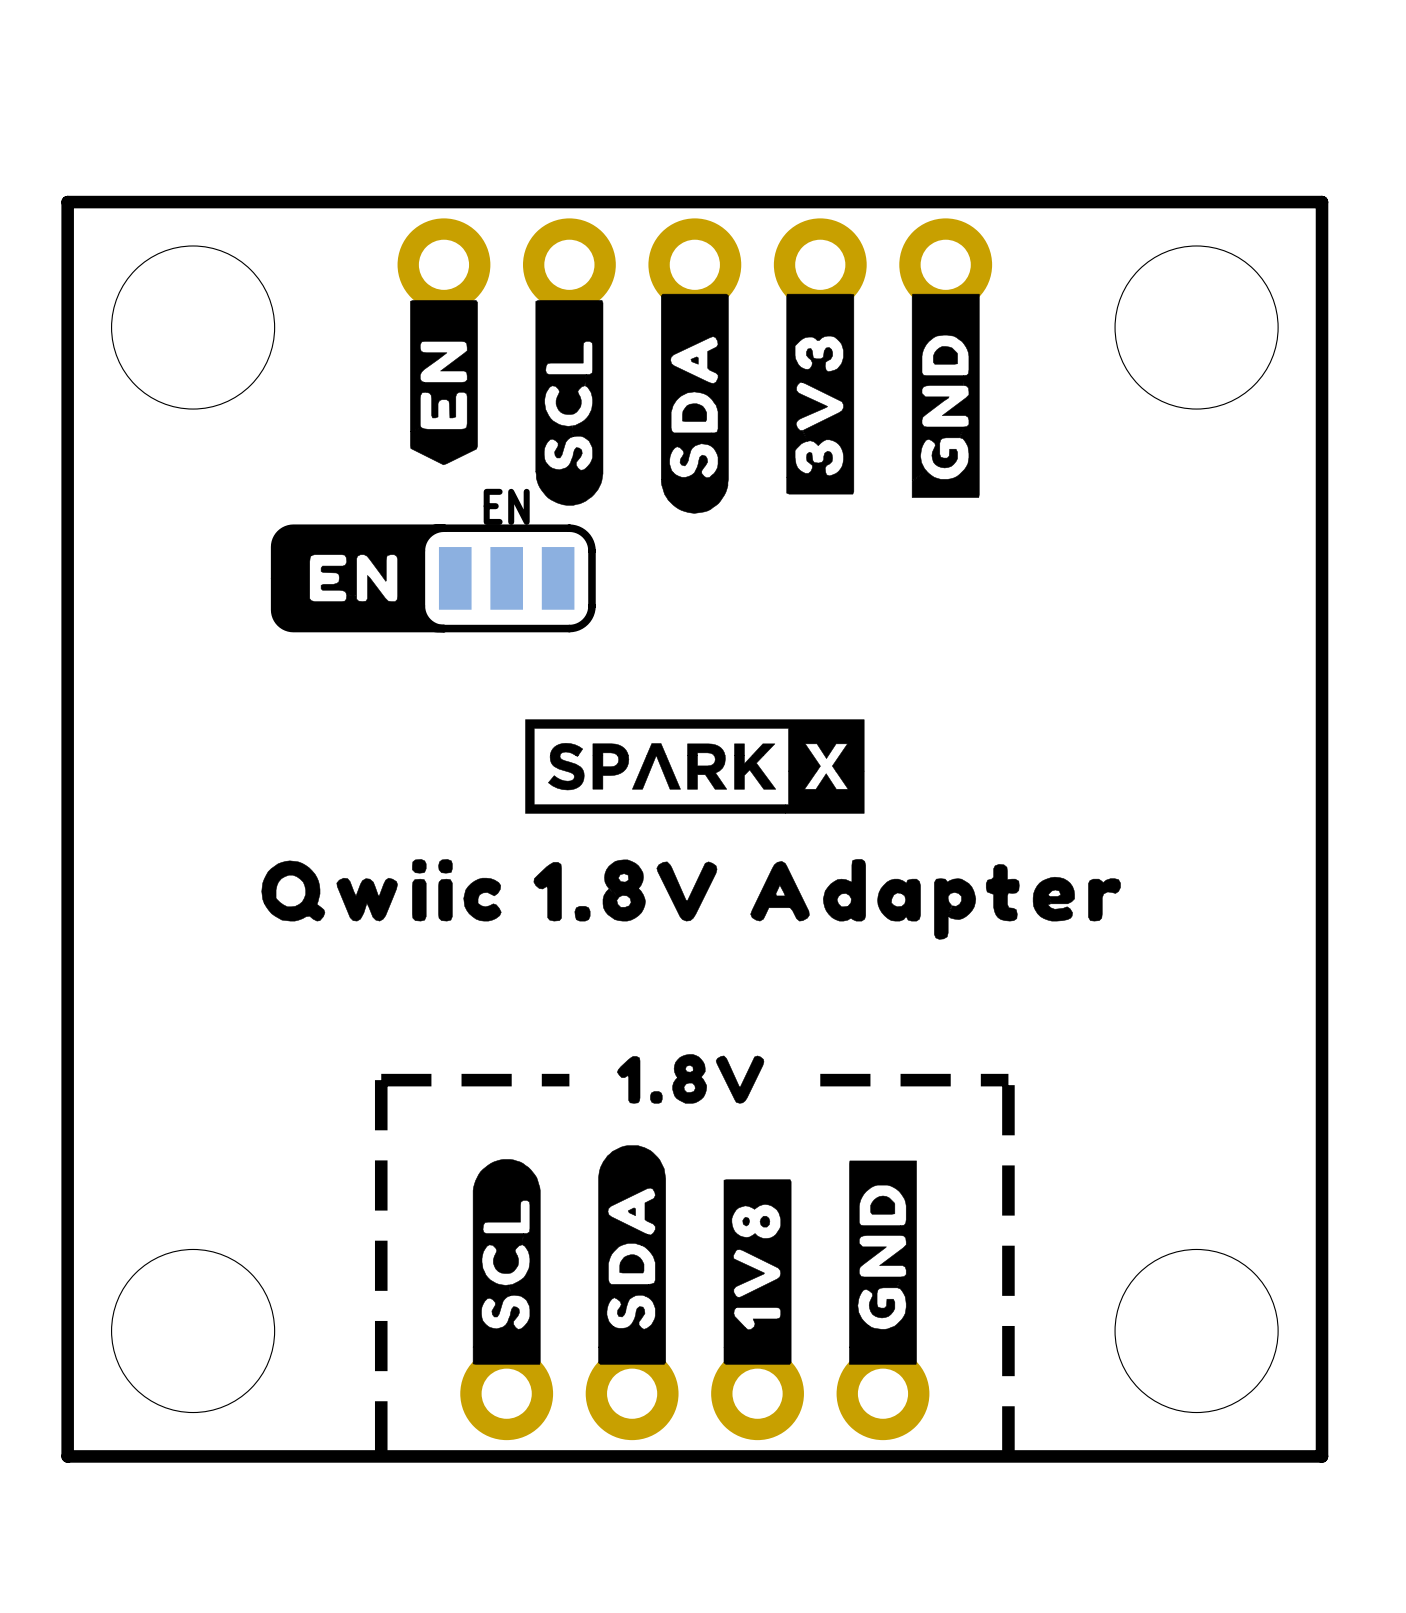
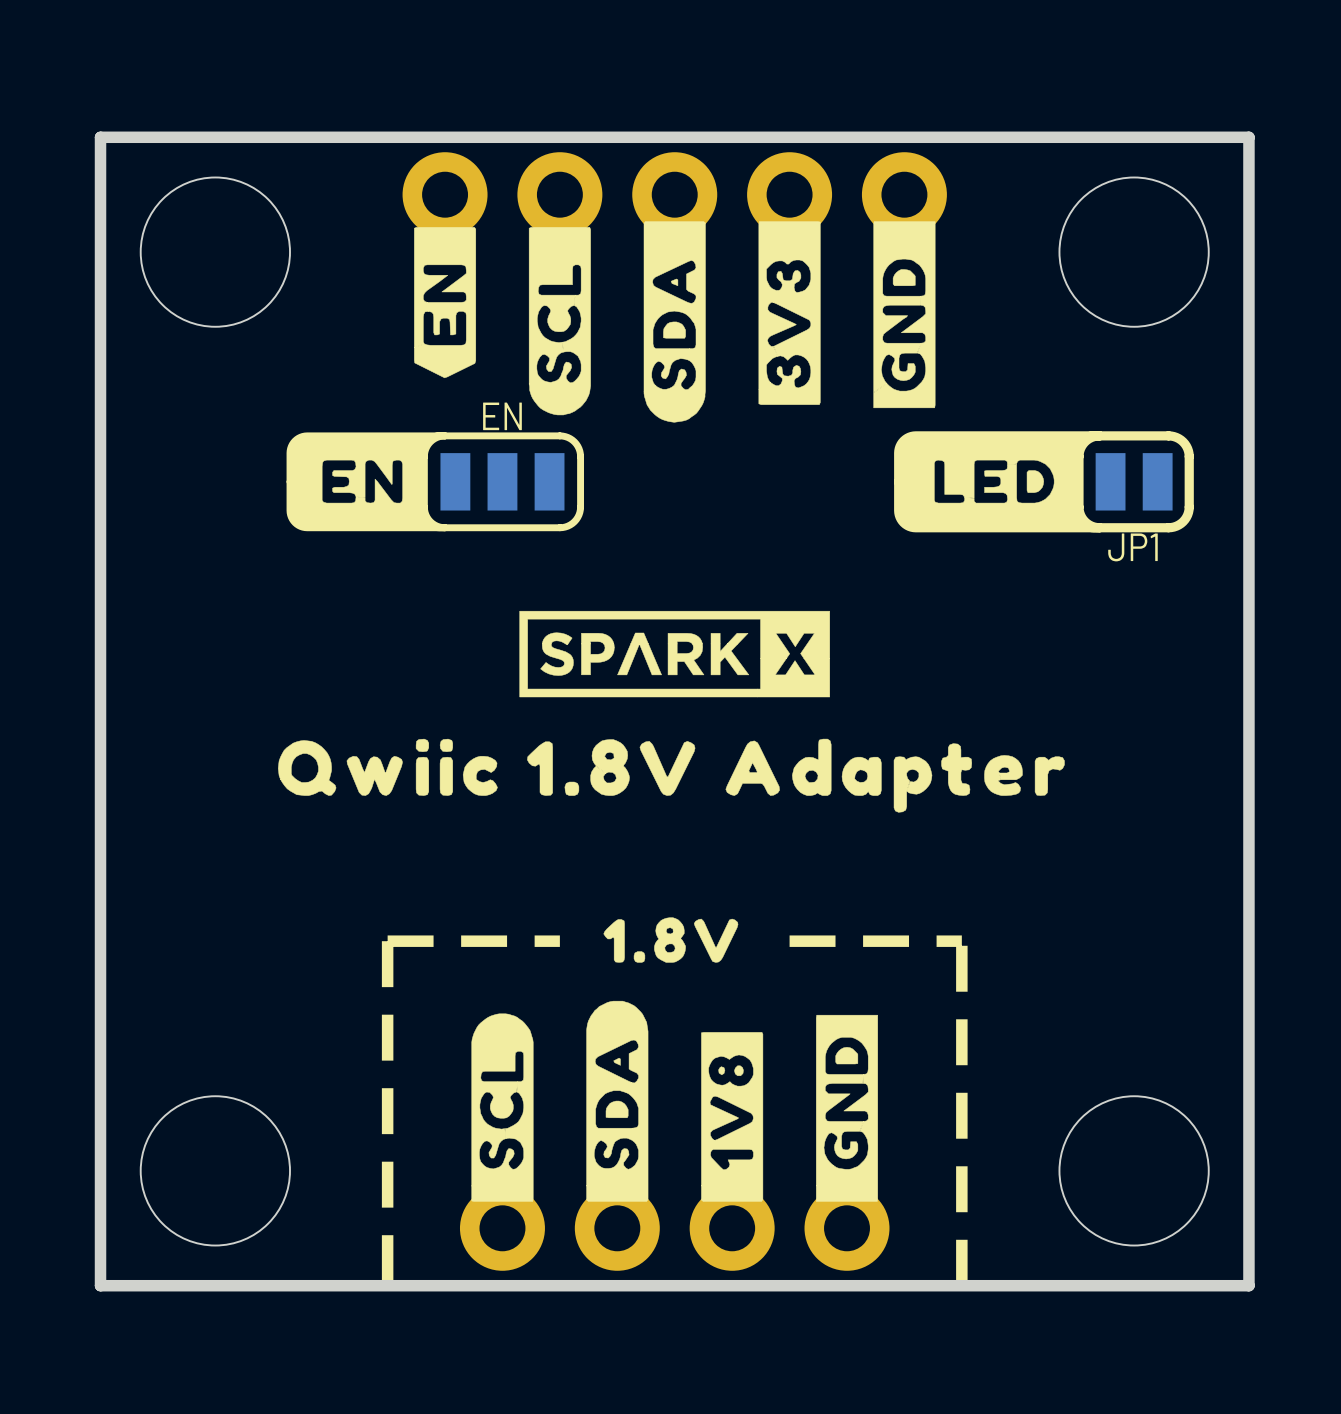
drawing: none -> [894, 431, 1105, 533]
JP1: none -> (1134, 481)

